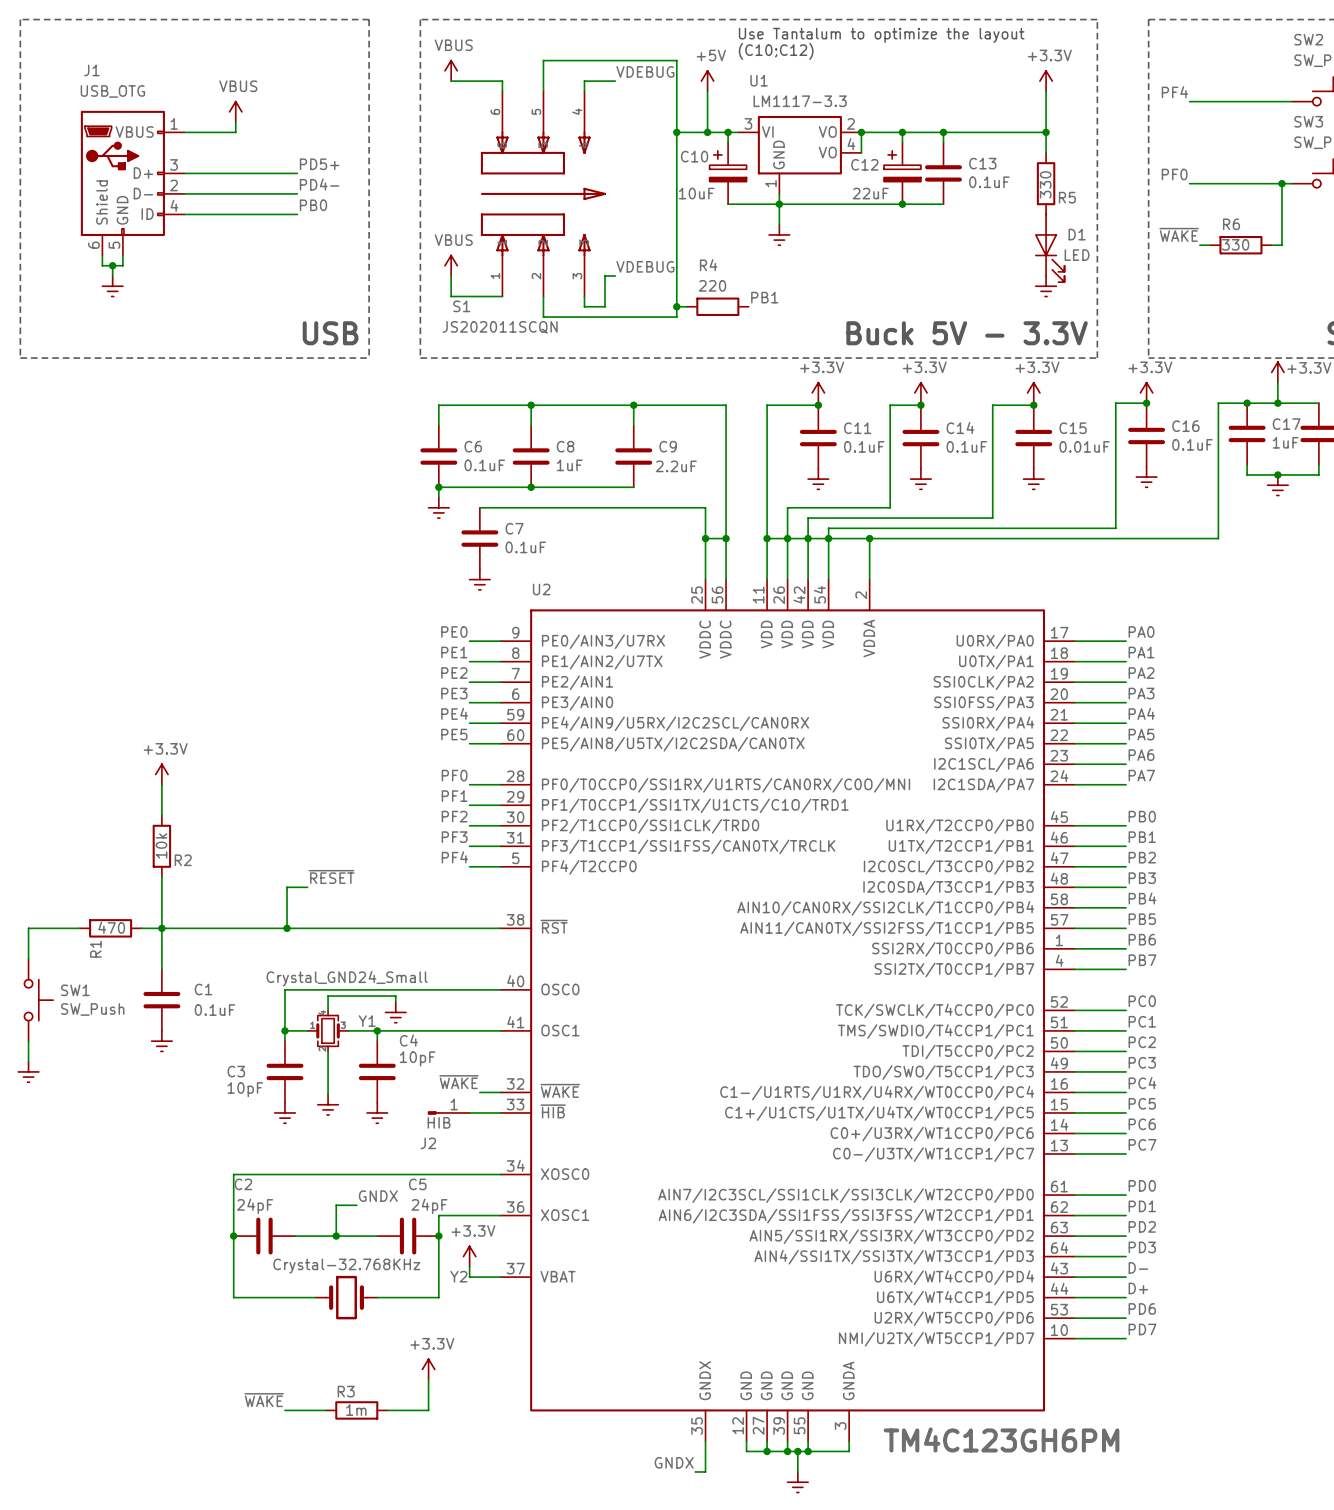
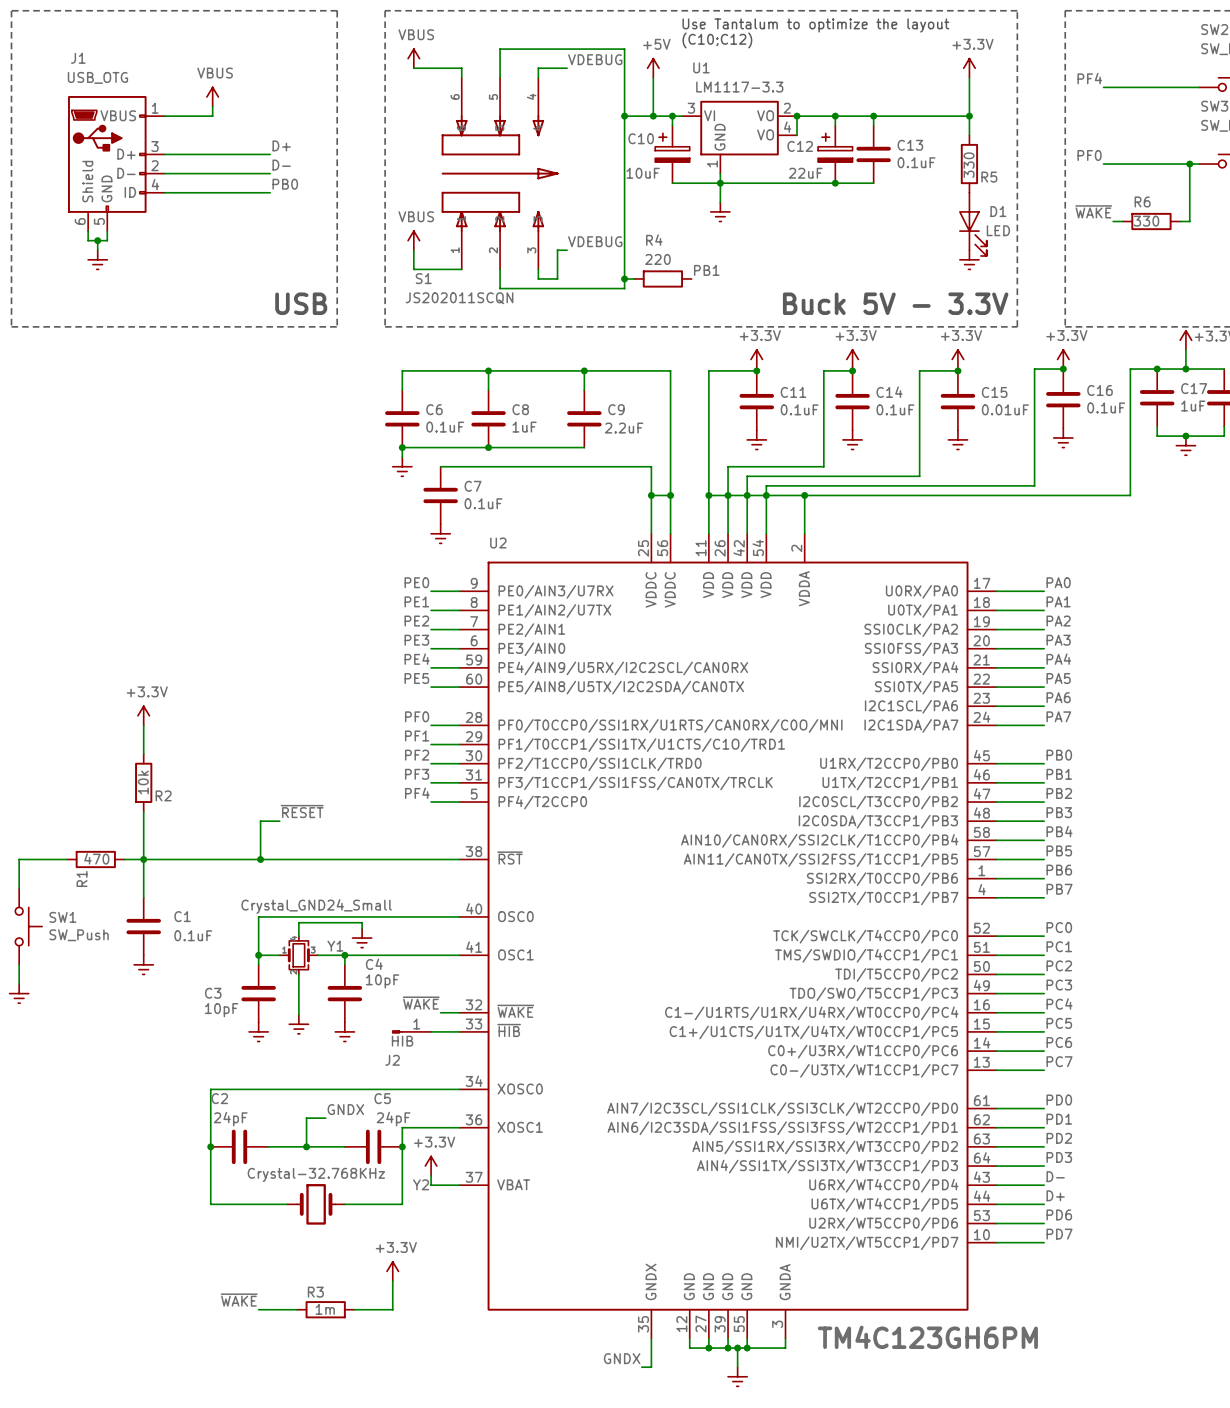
label: PD5+ (319, 164) -> D+ (281, 145)
label: PD4- (319, 184) -> D- (281, 165)

